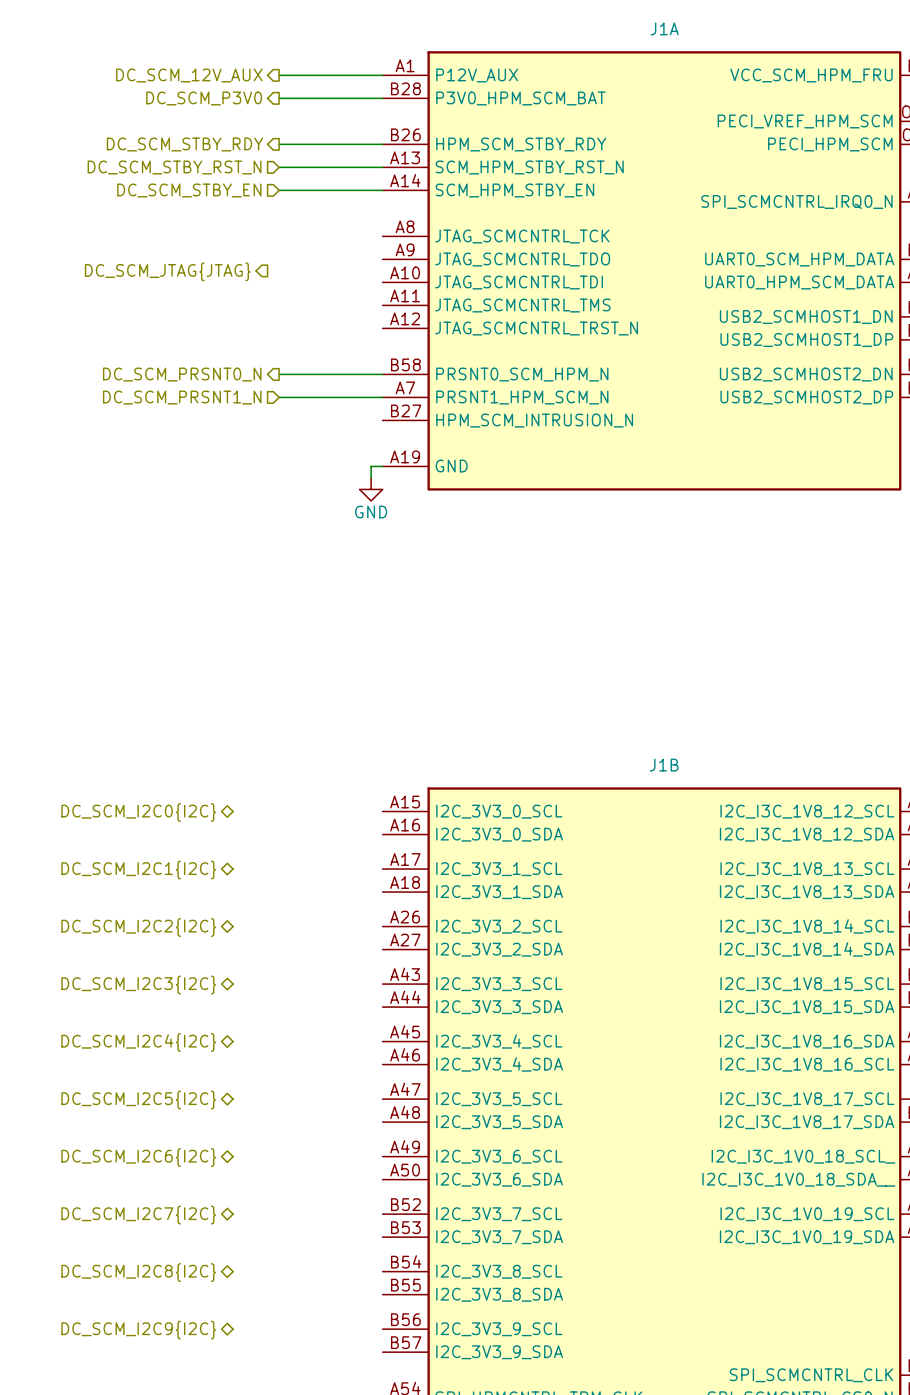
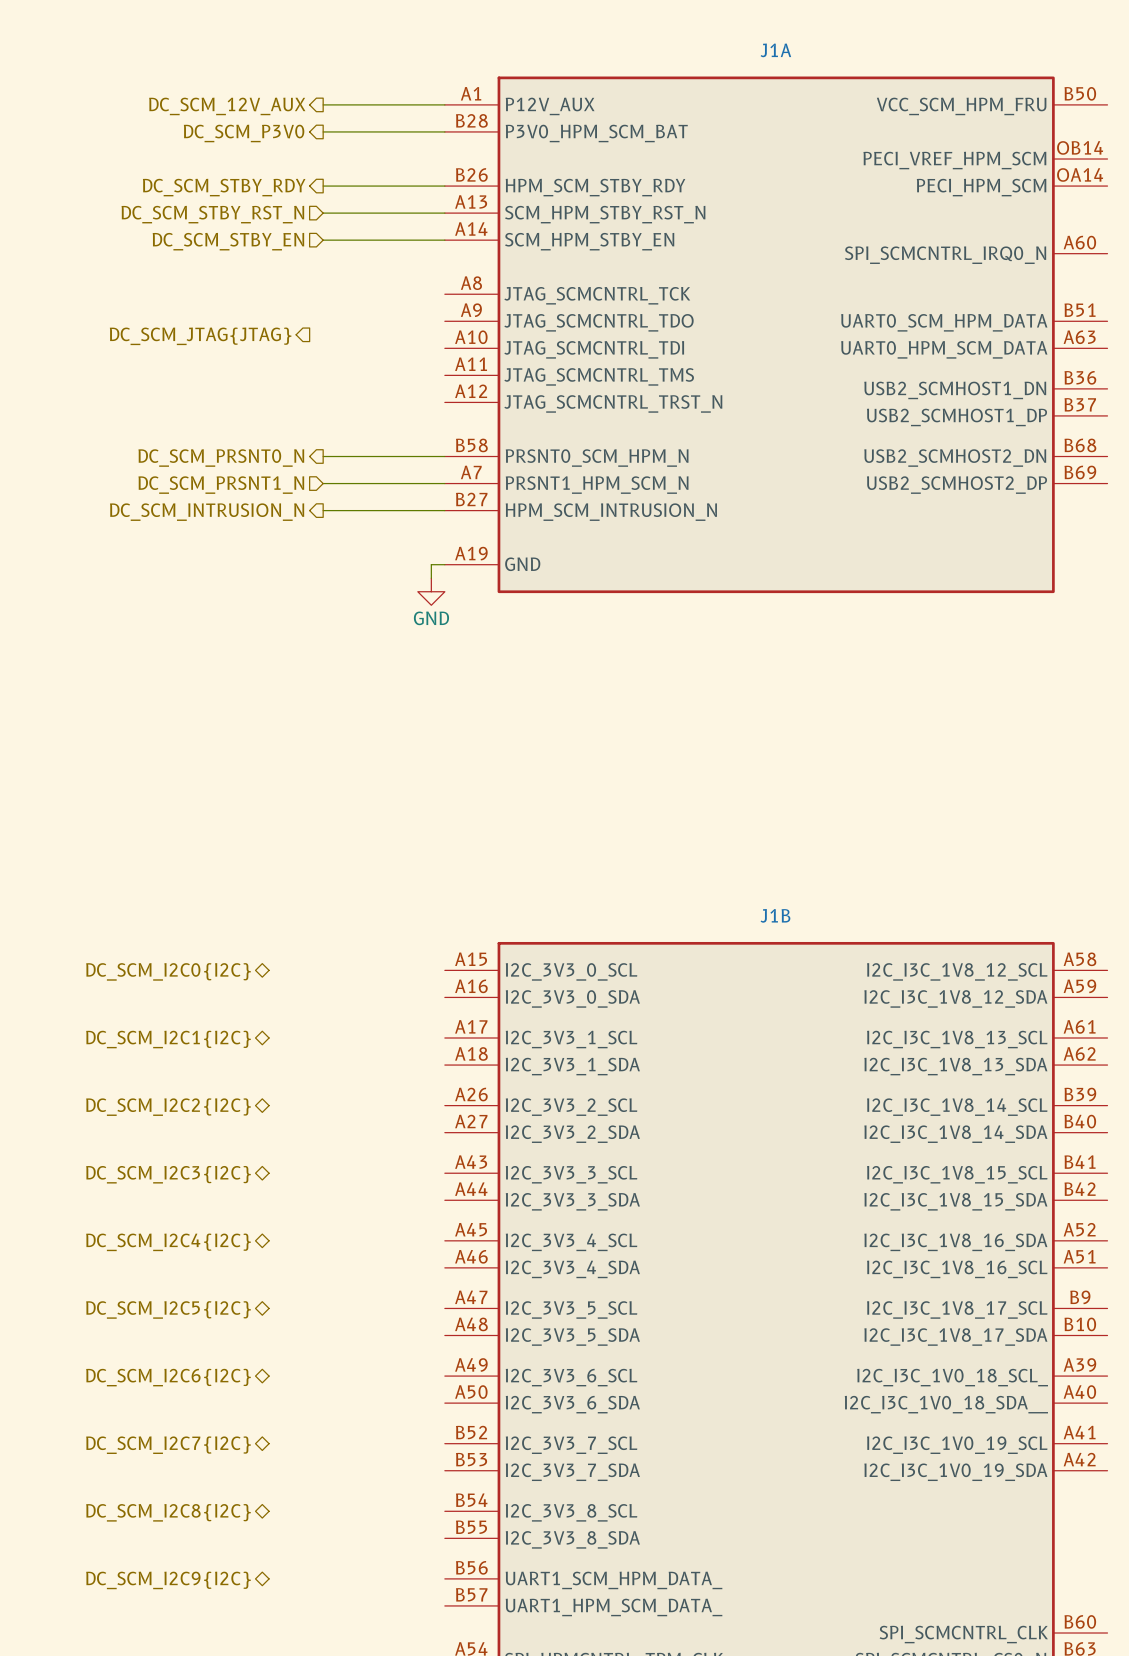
hierarchical label: none -> DC_SCM_INTRUSION_N (207, 512)
wire: none -> (323, 510) (444, 510)
J1B pin name: I2C_3V3_9_SCL (499, 1329) -> UART1_SCM_HPM_DATA_ (614, 1580)
J1B pin name: I2C_3V3_9_SDA (499, 1352) -> UART1_HPM_SCM_DATA_ (614, 1607)

